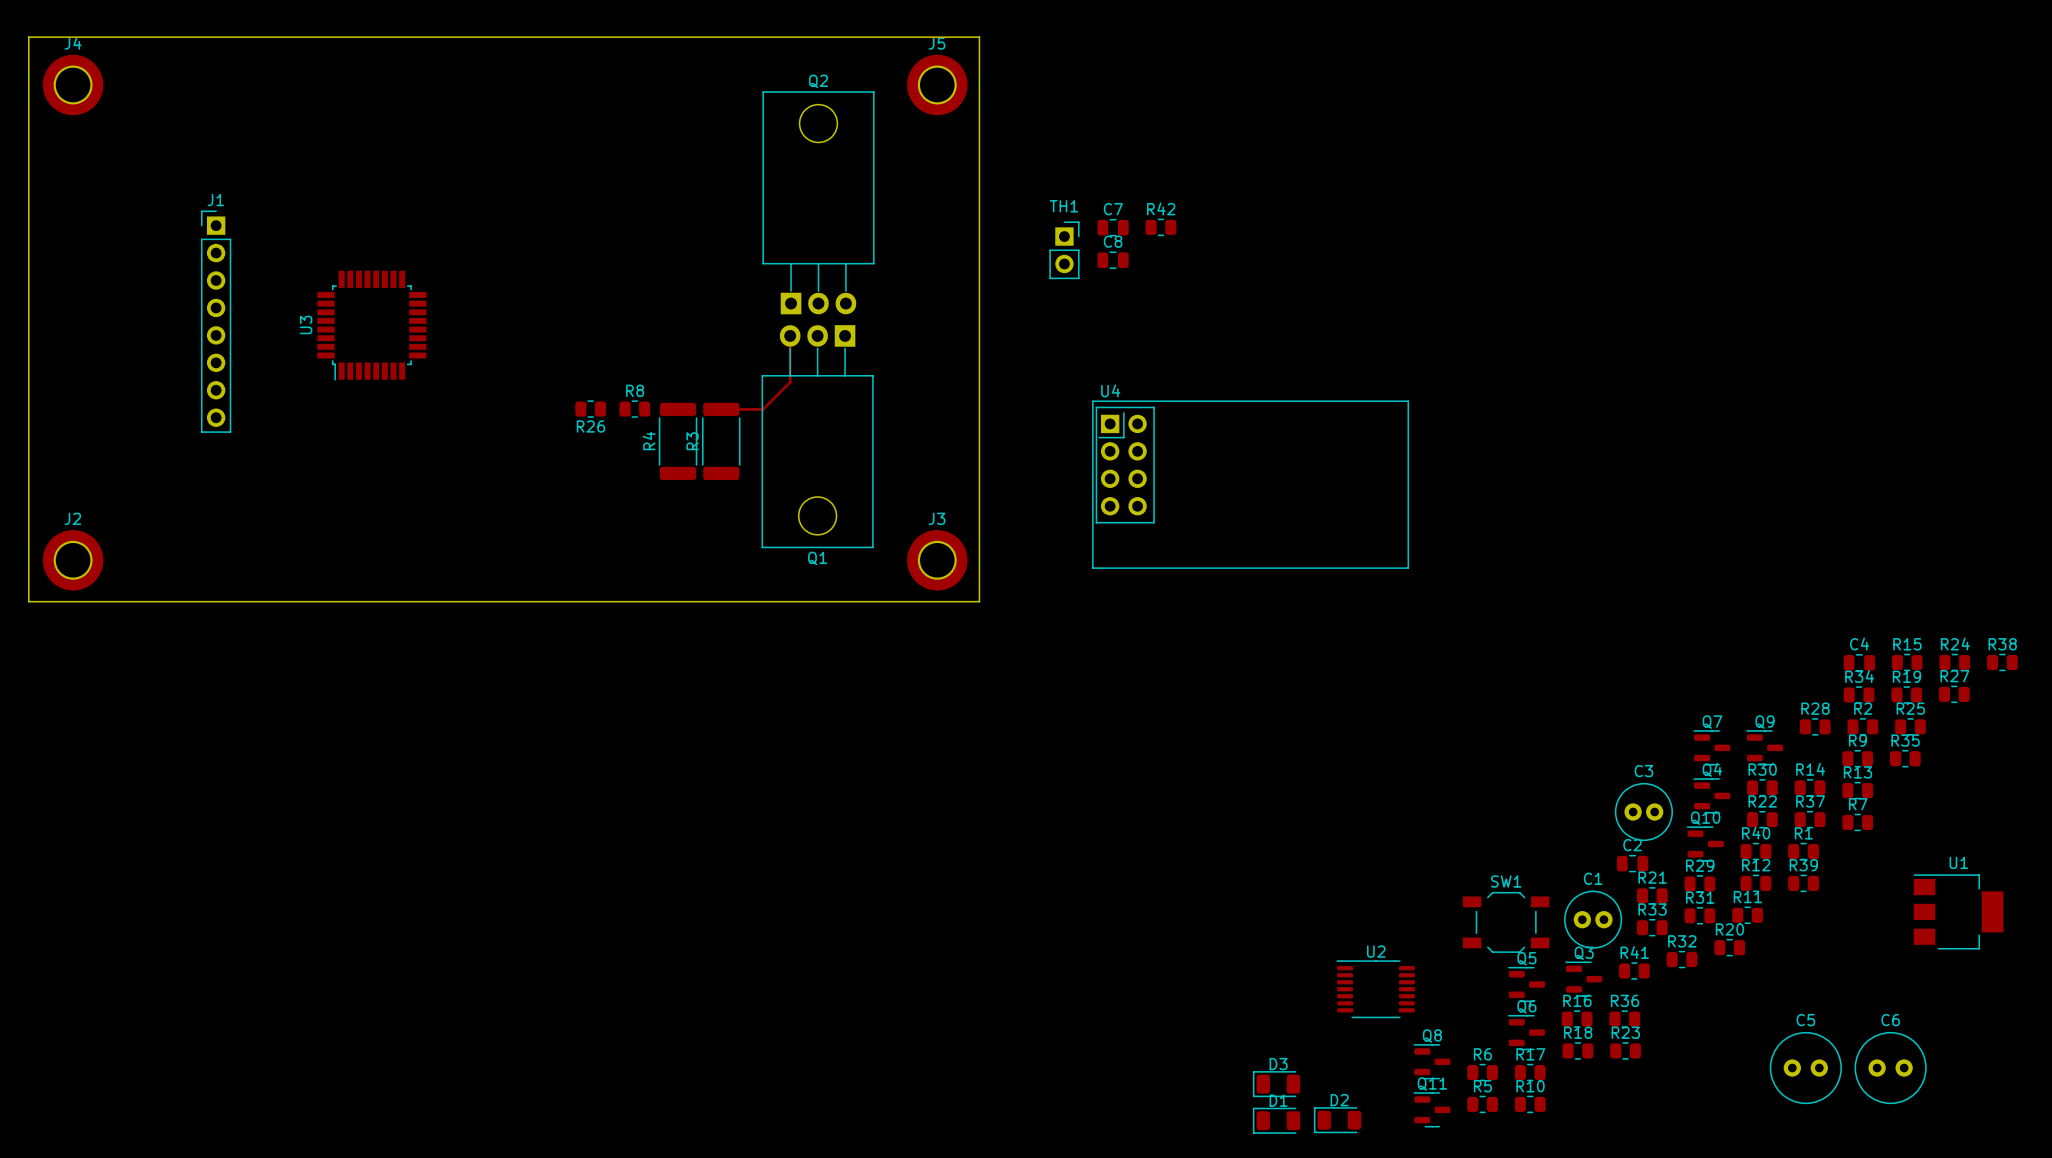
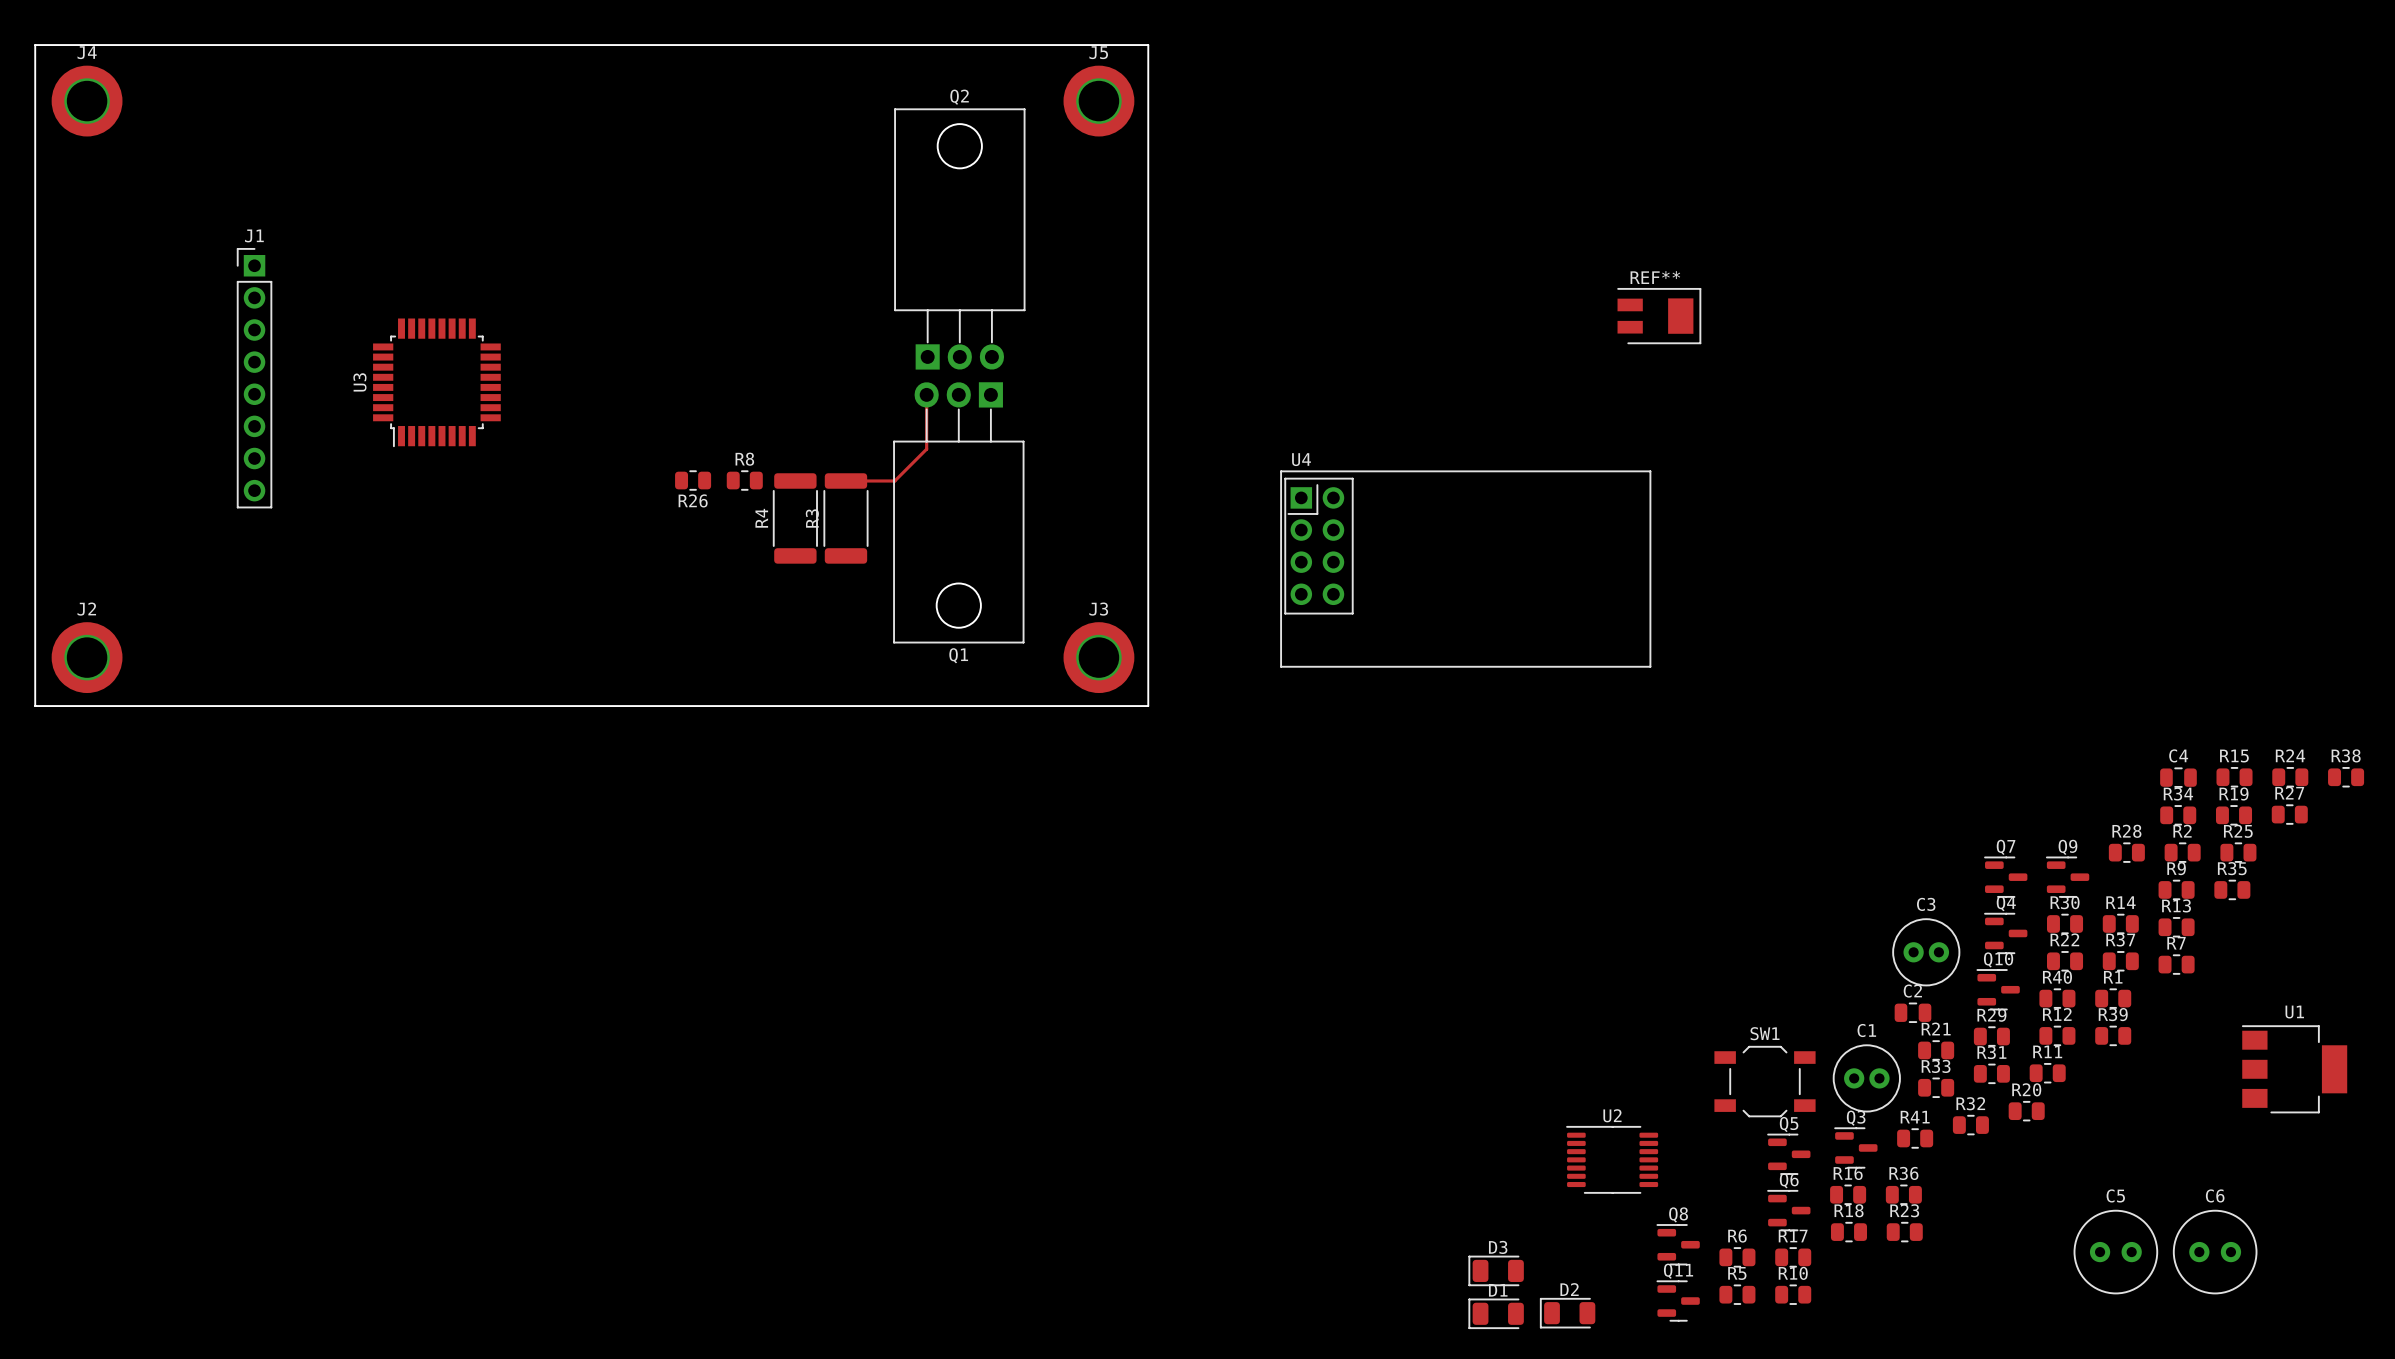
C7: (1113, 227) -> none
R42: (1160, 227) -> none
TH1: (1064, 250) -> none
C8: (1113, 260) -> none
REF**: none -> (1659, 316)

